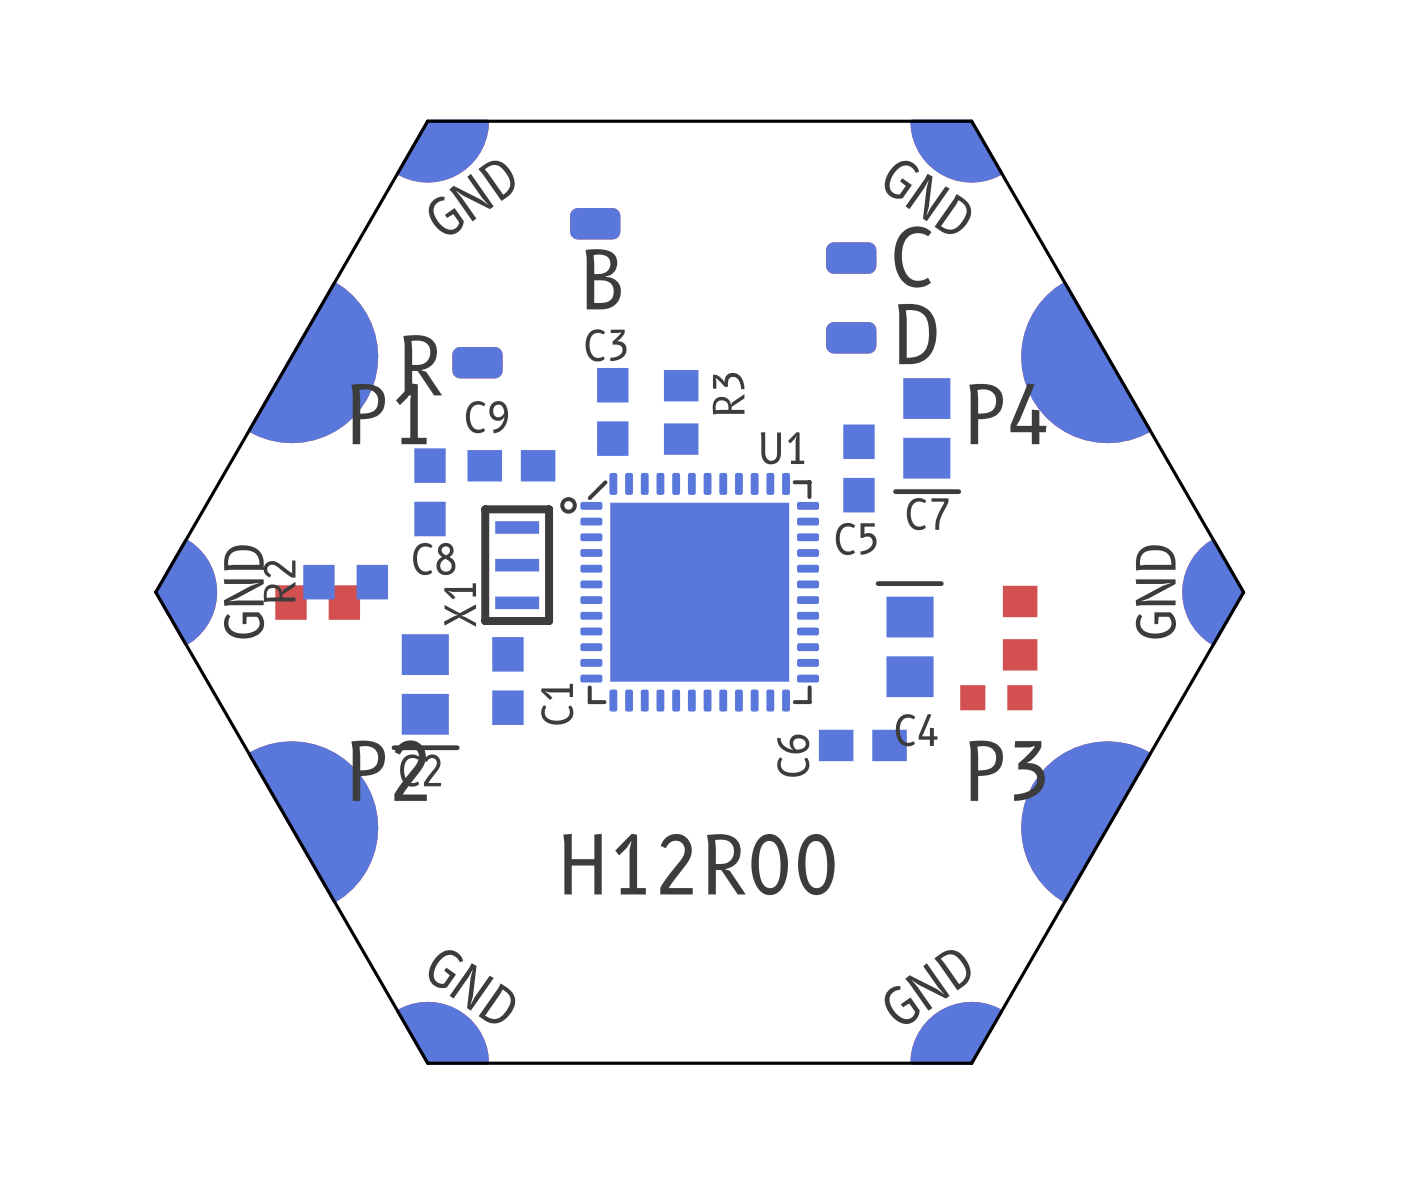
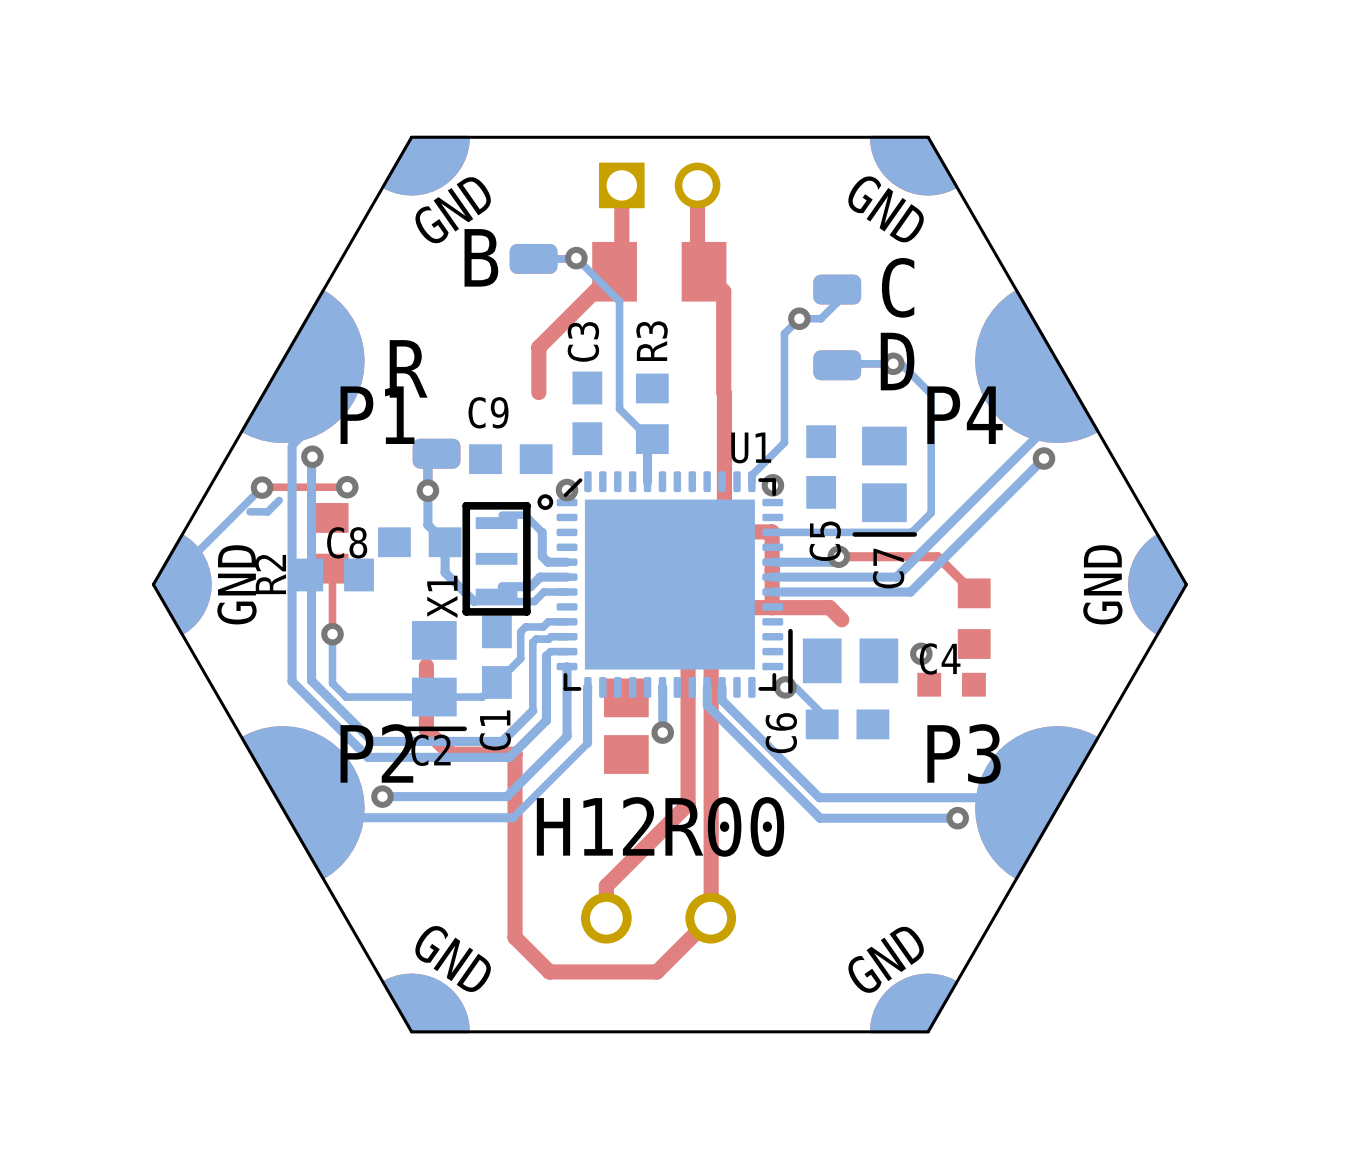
top track: none -> (621, 185) (621, 264) (538, 347) (538, 392)
part: none -> (659, 185)
top track: none -> (697, 185) (697, 265) (723, 291) (724, 525) (730, 531) (772, 531) (772, 607)
part position: (595, 223) -> (533, 258)
via: none -> (576, 258)
bottom track: none -> (533, 258) (576, 258) (619, 301) (619, 409) (649, 439) (647, 441) (647, 481)
text position: C (912, 256) -> C (898, 287)
part: (851, 258) -> none
part: none -> (659, 271)
text position: B (603, 279) -> B (481, 257)
bottom track: none -> (837, 289) (837, 302) (821, 318) (799, 318) (784, 333) (784, 442) (751, 475) (751, 481)
part: none -> (837, 289)
via: none -> (799, 318)
text position: D (917, 334) -> D (897, 361)
part: (851, 337) -> none
C3 name rotation: 0° (606, 345) -> 90° counterclockwise (583, 341)
via: none -> (893, 363)
bottom track: none -> (837, 365) (893, 363) (902, 365) (931, 394) (931, 512) (911, 532) (772, 532)
part: none -> (837, 365)
part: (477, 362) -> none
bottom track: none -> (300, 371) (300, 437) (292, 446) (292, 681) (368, 757) (509, 757) (546, 720) (546, 655) (550, 651) (567, 651)
bottom track: none -> (1039, 371) (1039, 434) (896, 577) (772, 577)
R3 name position: R3 (728, 393) -> R3 (652, 341)
C7 position: (927, 436) -> (884, 481)
bottom track: none -> (436, 453) (427, 462) (427, 525) (445, 542) (445, 572) (474, 601) (534, 601) (543, 592) (567, 592)
part: none -> (436, 453)
bottom track: none -> (312, 456) (311, 680) (372, 741) (502, 741) (532, 710) (532, 642) (536, 639) (567, 636)
via: none -> (312, 456)
bottom track: none -> (1043, 458) (910, 592) (772, 592)
via: none -> (1043, 458)
C9 position: (511, 465) -> (510, 459)
via: none -> (772, 485)
top track: none -> (347, 487) (262, 487)
via: none -> (347, 487)
bottom track: none -> (262, 487) (177, 572) (177, 584)
via: none -> (262, 487)
C8 rotation: 0° (430, 492) -> 90° clockwise (419, 542)
C8 position: (430, 492) -> (419, 542)
via: none -> (567, 490)
via: none -> (427, 490)
bottom track: none -> (279, 500) (267, 511) (250, 511)
C7 name rotation: 0° (927, 514) -> 90° counterclockwise (888, 568)
bottom track: none -> (502, 515) (525, 515) (542, 532) (542, 556) (547, 562) (567, 562)
top track: none -> (625, 531) (668, 531) (688, 551) (688, 804) (606, 886) (606, 918)
C5 name rotation: 0° (856, 538) -> 90° counterclockwise (825, 541)
bottom track: none -> (838, 556) (833, 562) (772, 562)
top track: none -> (838, 556) (937, 556) (974, 593)
via: none -> (838, 556)
top track: none -> (332, 568) (332, 634)
bottom track: none -> (567, 577) (540, 577) (530, 586) (502, 586)
part rotation: 0° (317, 602) -> 90° clockwise (332, 543)
part position: (317, 602) -> (332, 543)
top track: none -> (841, 619) (829, 607) (736, 607) (711, 632) (711, 917) (657, 971) (549, 971) (515, 937) (515, 754) (450, 754) (426, 729) (426, 665)
bottom track: none -> (567, 621) (548, 621) (543, 626) (525, 626) (520, 631) (520, 658) (482, 697) (346, 697) (332, 683) (332, 634)
C4 rotation: 0° (909, 639) -> 90° counterclockwise (843, 661)
via: none -> (332, 634)
via: none -> (921, 653)
bottom track: none -> (567, 666) (567, 736) (506, 796) (382, 796)
C1 position: (507, 681) -> (496, 657)
C2 position: (425, 692) -> (434, 676)
bottom track: none -> (587, 687) (587, 743) (513, 817) (320, 817) (300, 797)
bottom track: none -> (662, 687) (662, 732)
bottom track: none -> (707, 687) (707, 705) (820, 818) (957, 818)
bottom track: none -> (722, 687) (722, 700) (819, 797) (1039, 797)
via: none -> (785, 687)
bottom track: none -> (795, 687) (822, 713) (822, 724)
C1 name position: C1 (557, 704) -> C1 (495, 730)
part: none -> (626, 726)
C6 position: (862, 745) -> (847, 724)
via: none -> (662, 732)
via: none -> (382, 796)
via: none -> (957, 818)
text position: H12R00 (698, 864) -> H12R00 (660, 826)
part: none -> (658, 918)

